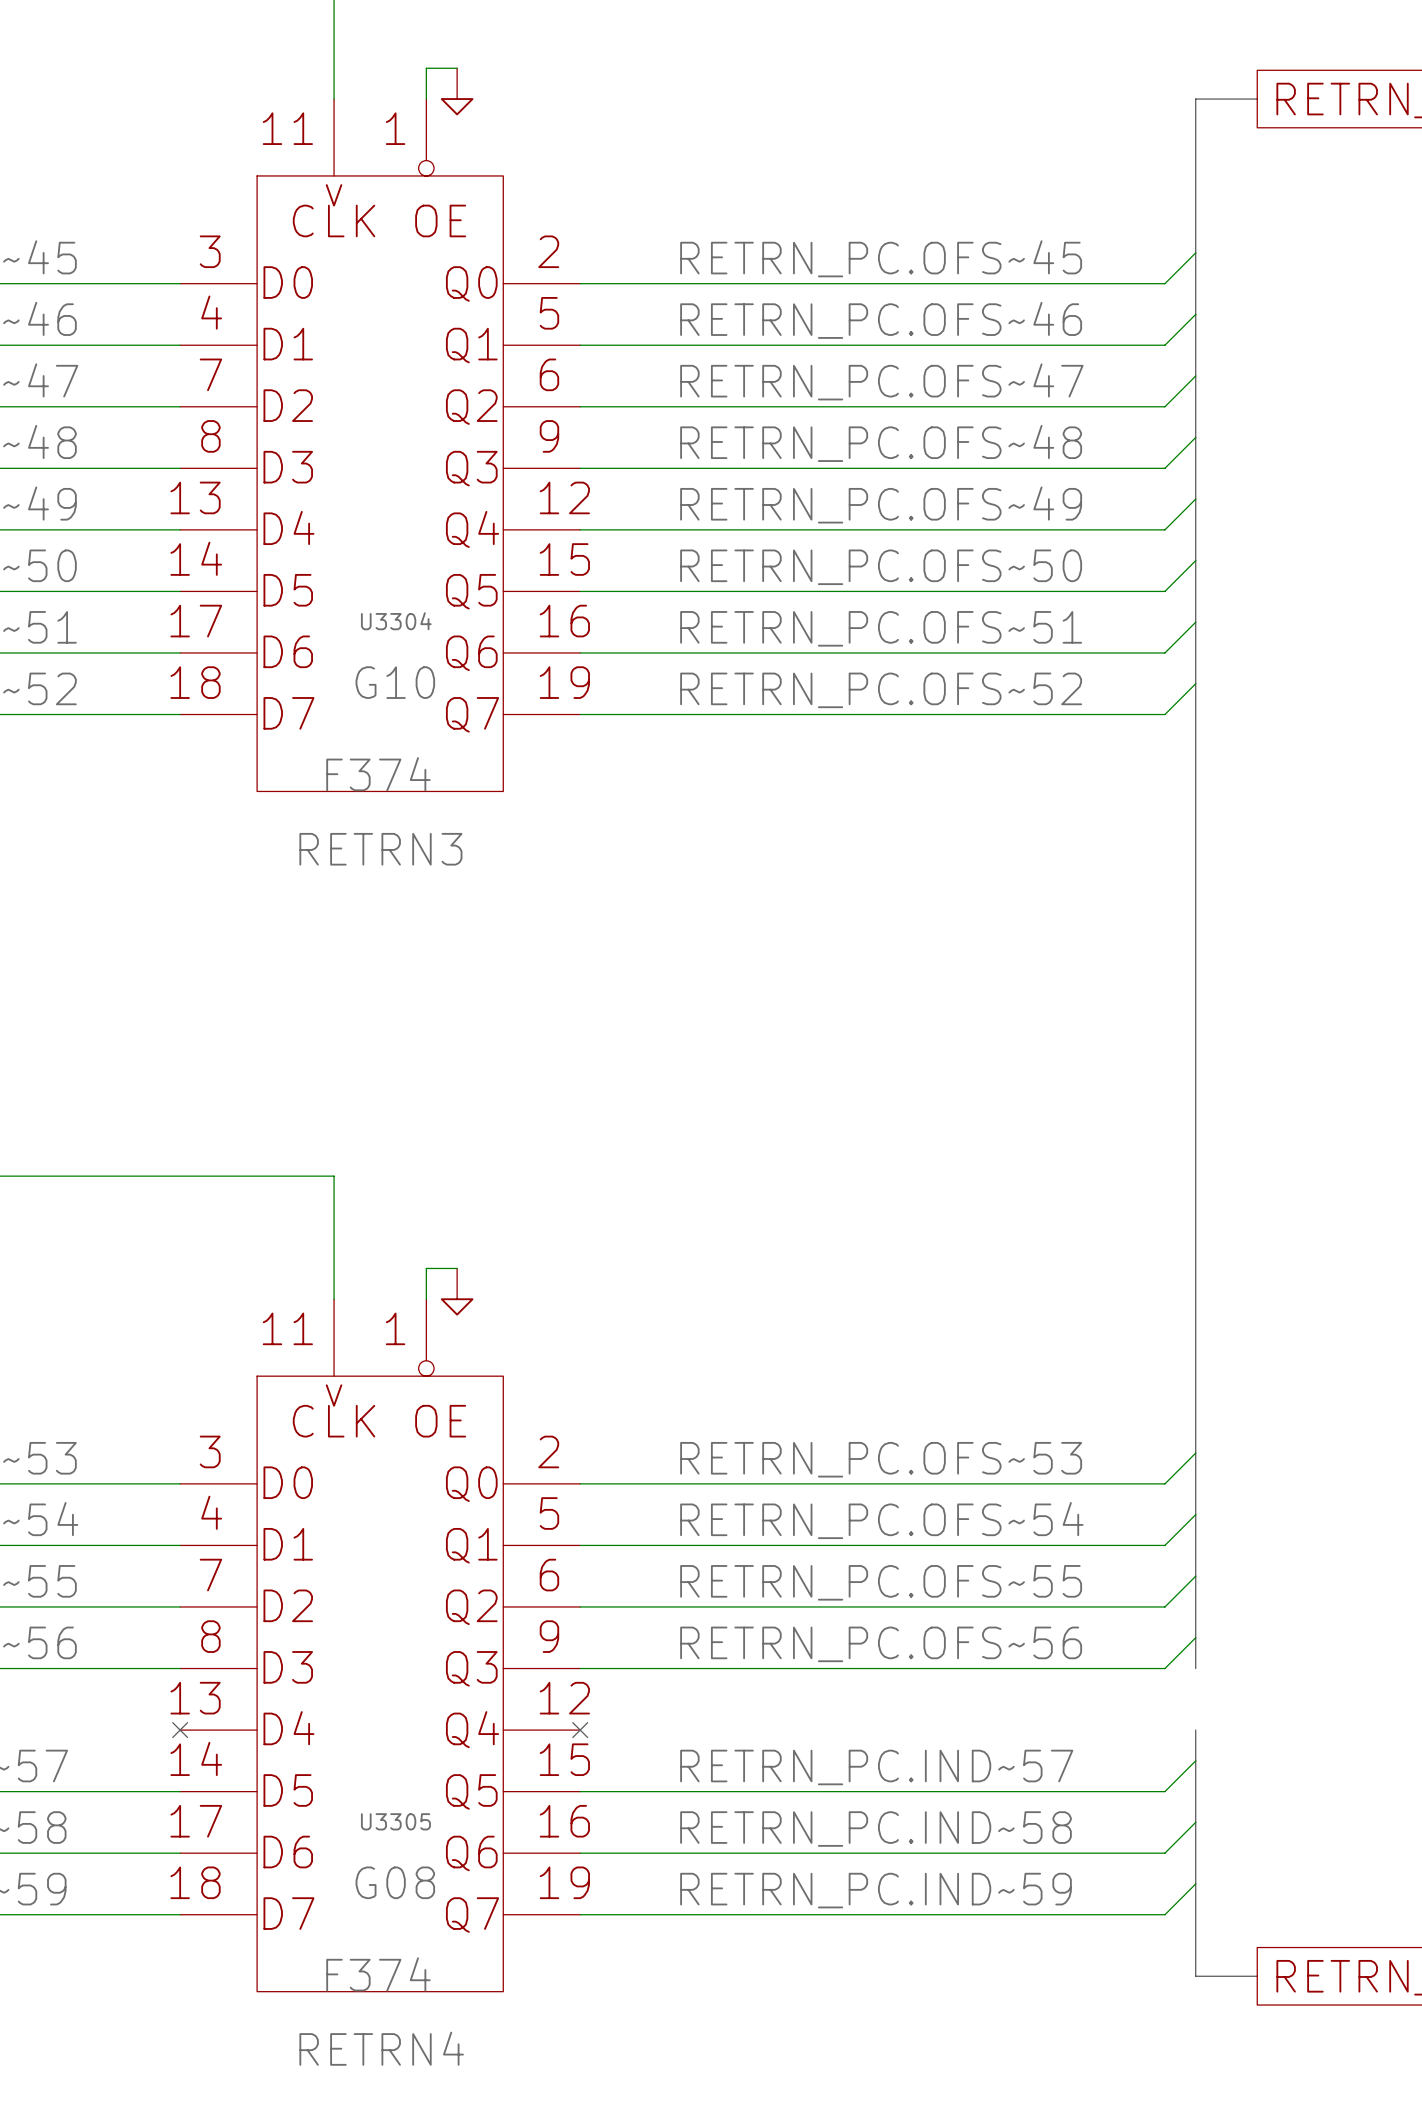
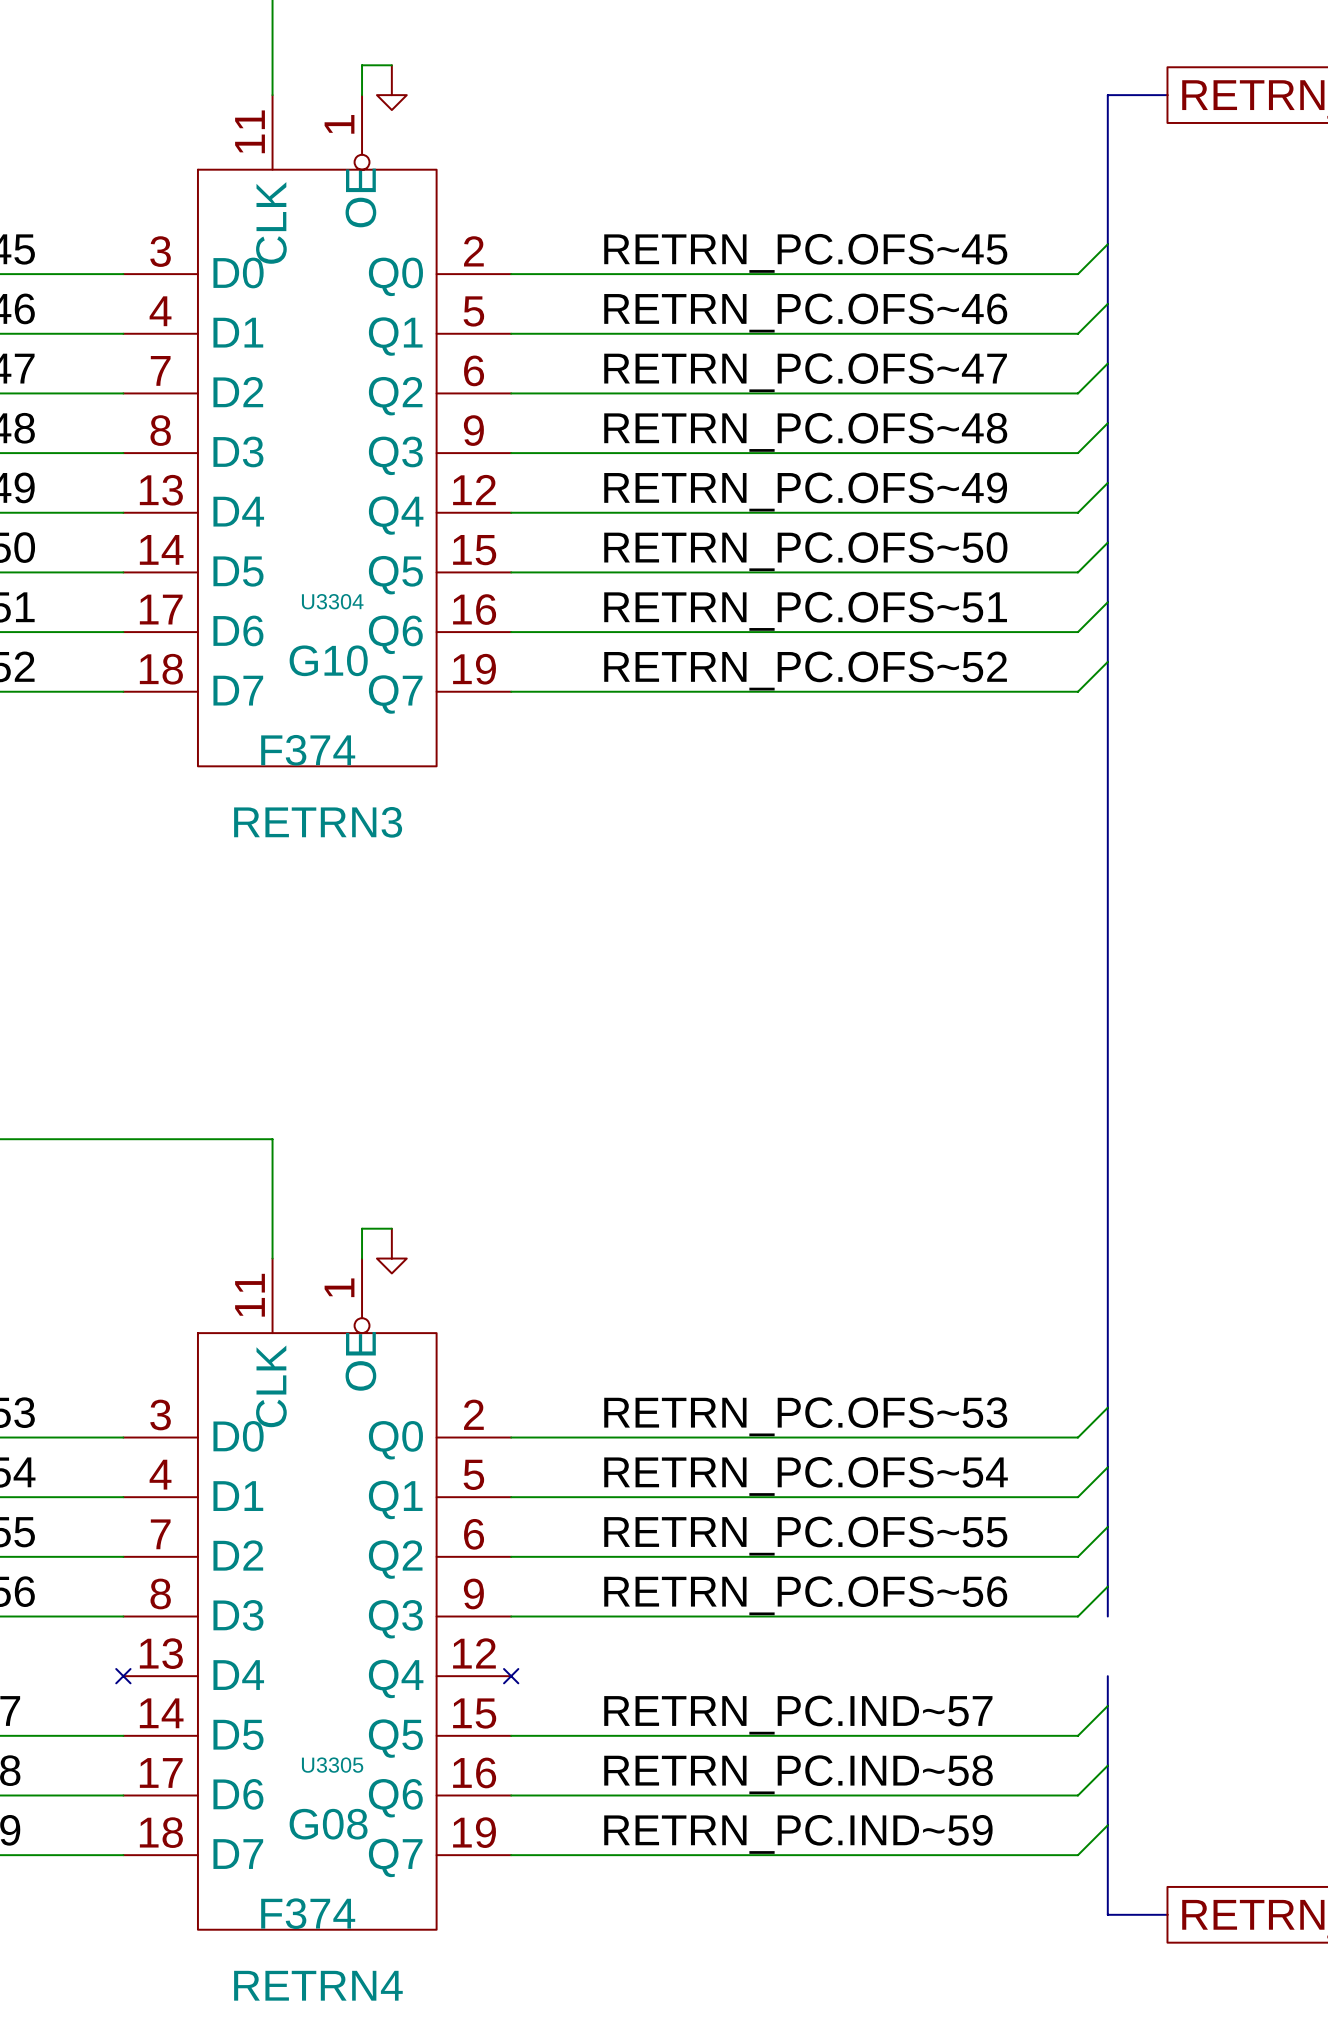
U3304 symbol: [180, 99, 581, 792] -> [123, 95, 512, 767]
U3305 symbol: [180, 1299, 581, 1992] -> [123, 1258, 512, 1930]

